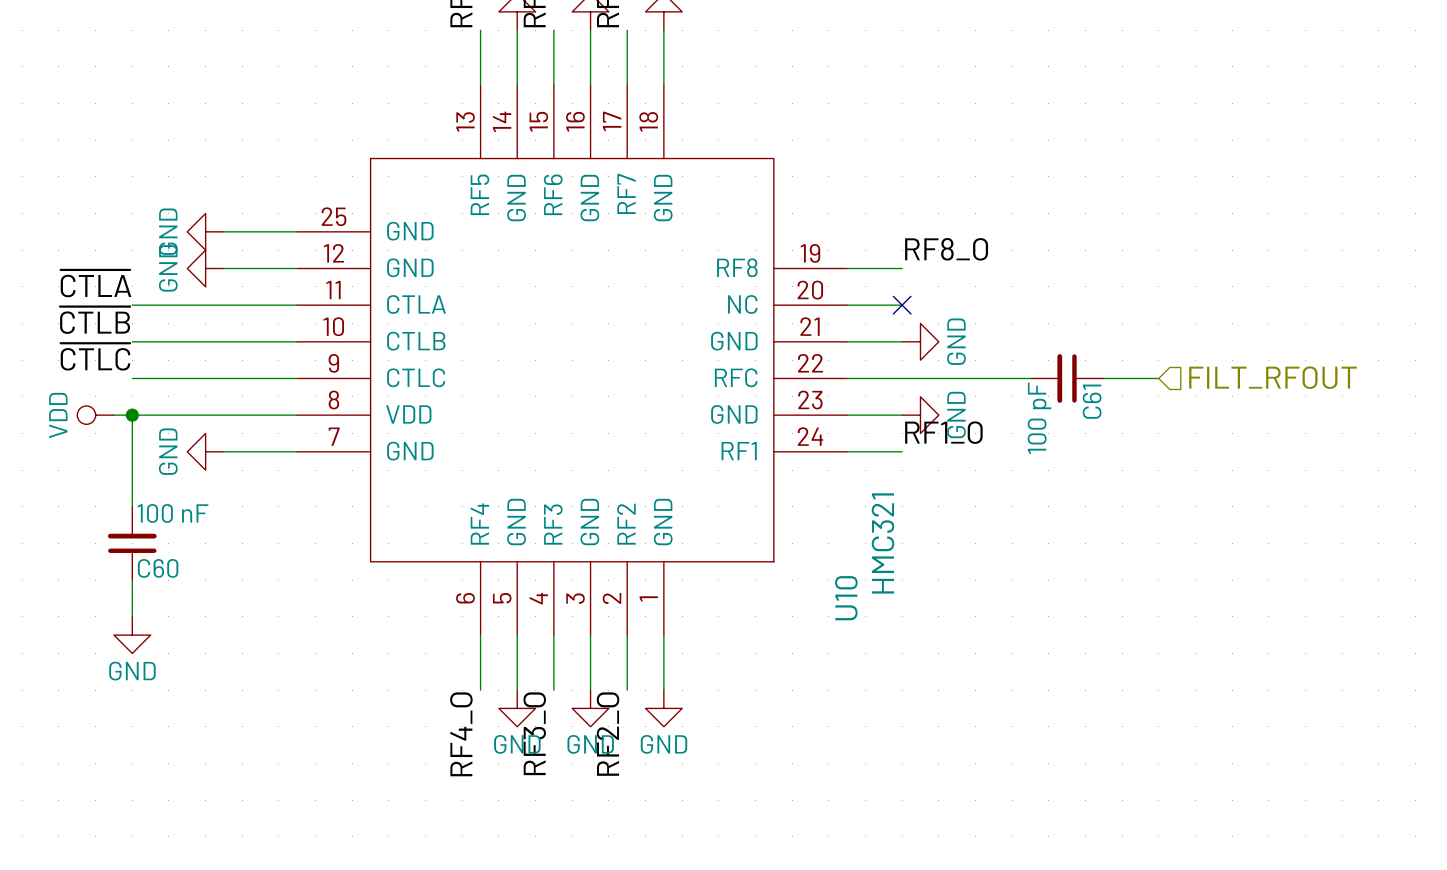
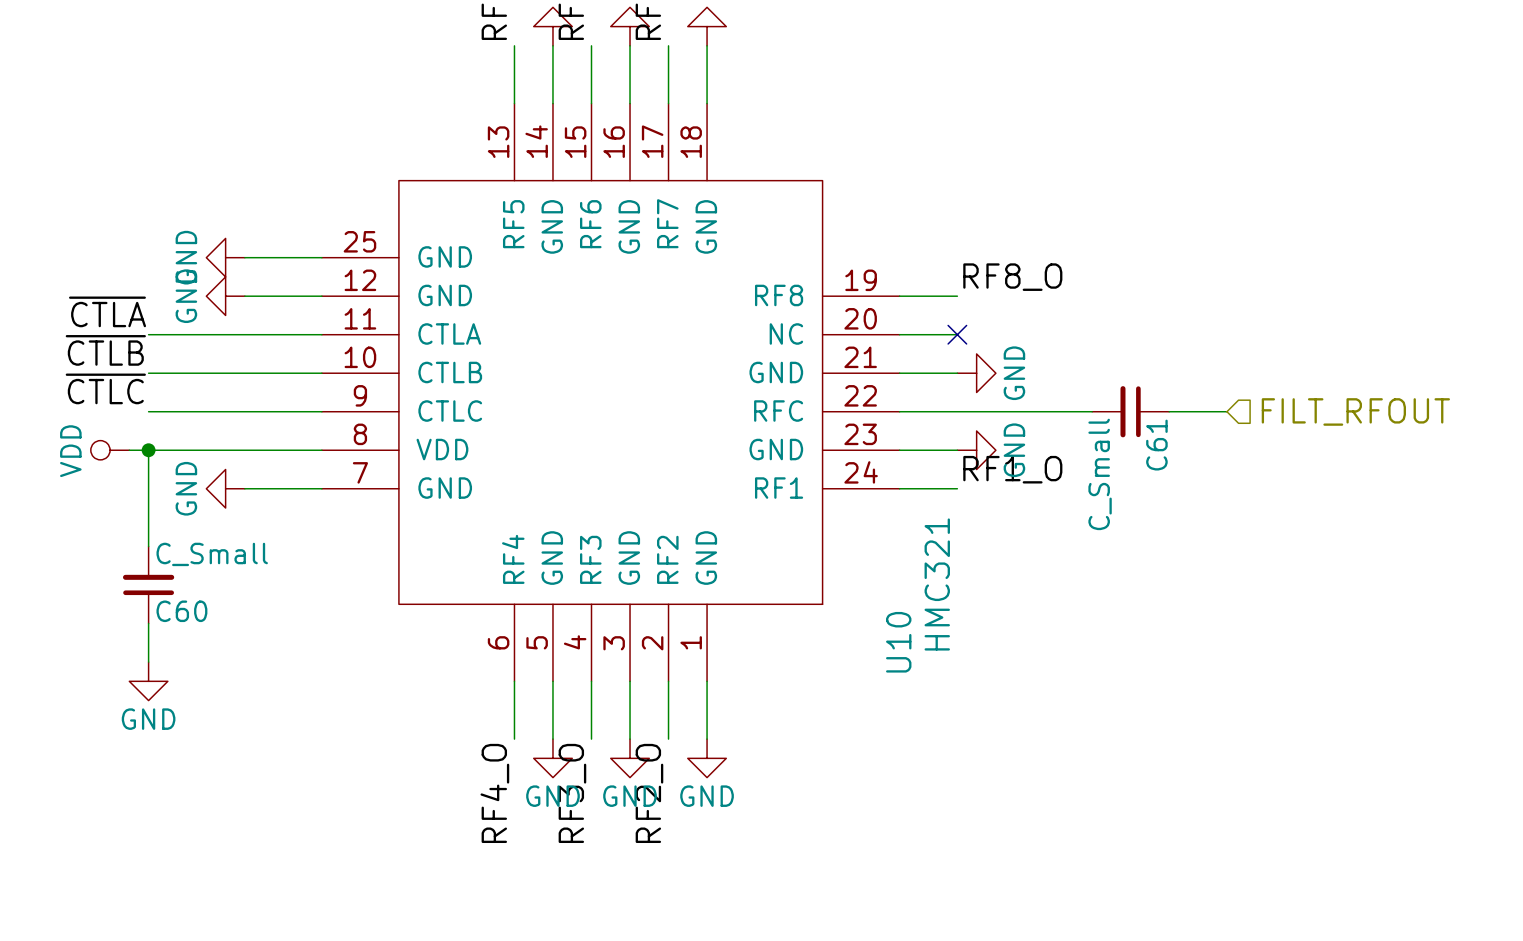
C61 value: 100 pF (1039, 418) -> C_Small (1100, 474)
C60 value: 100 nF (172, 513) -> C_Small (212, 554)

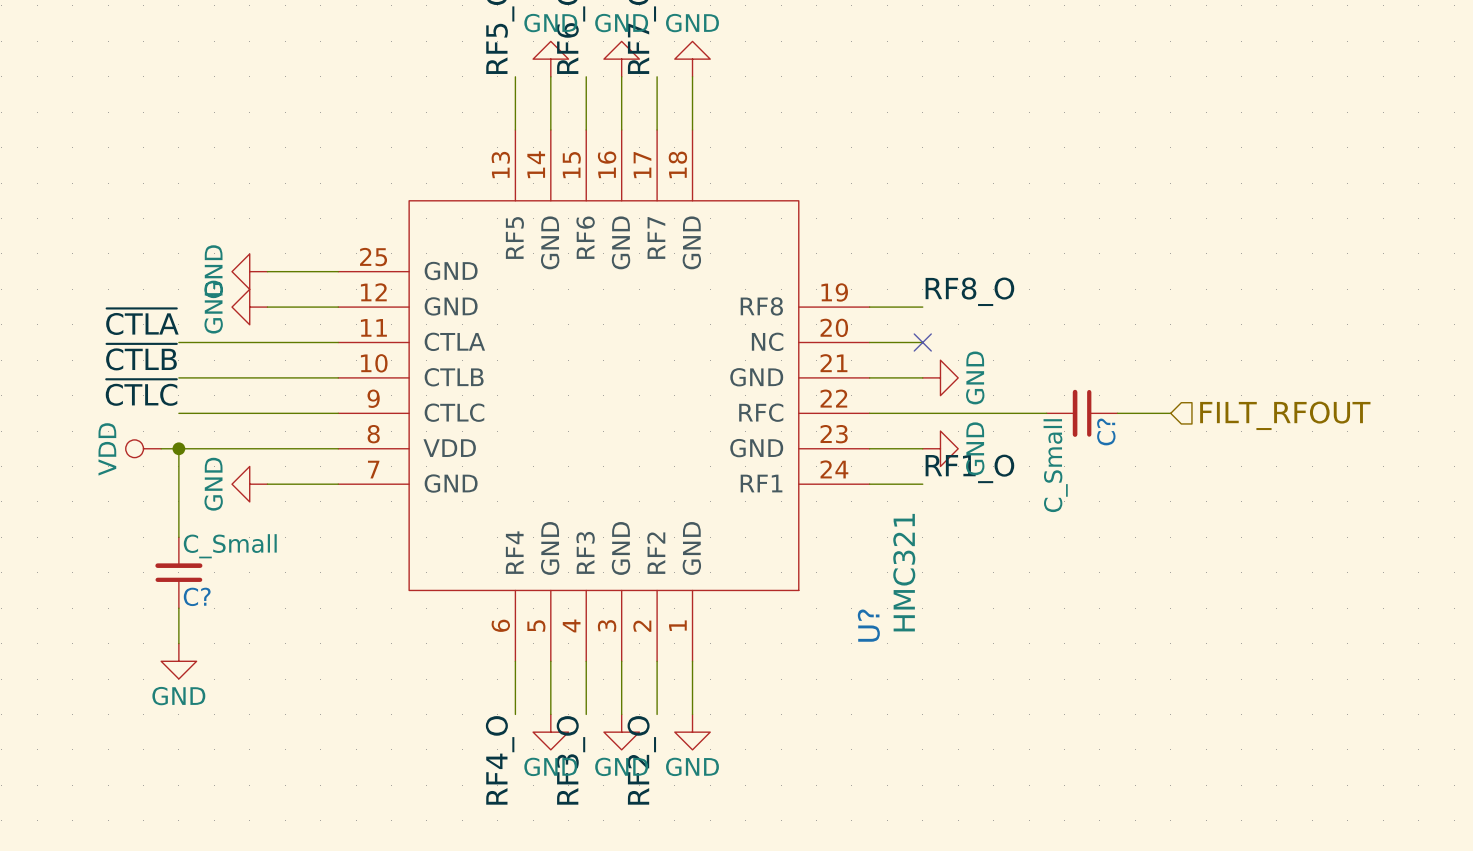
C61 name: C61 (1156, 445) -> C? (1106, 431)
C60 name: C60 (181, 611) -> C? (197, 596)
U10 name: U10 (898, 642) -> U? (868, 625)

